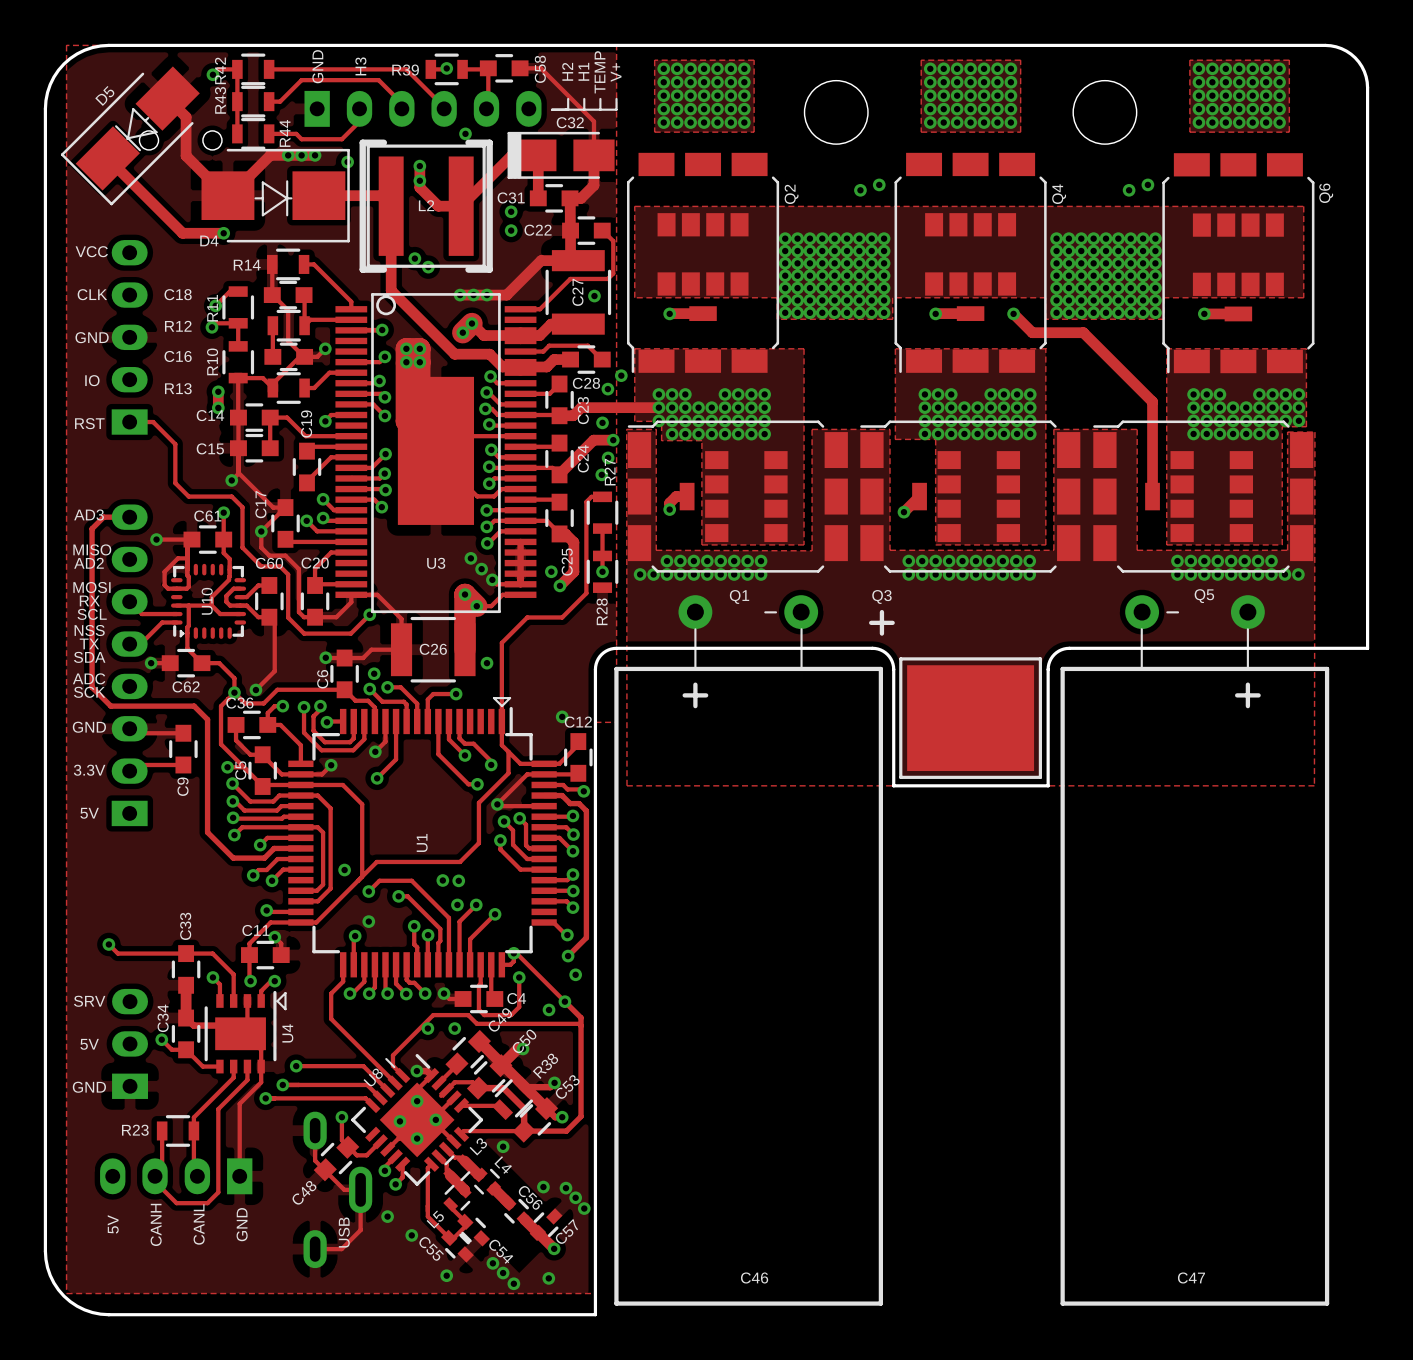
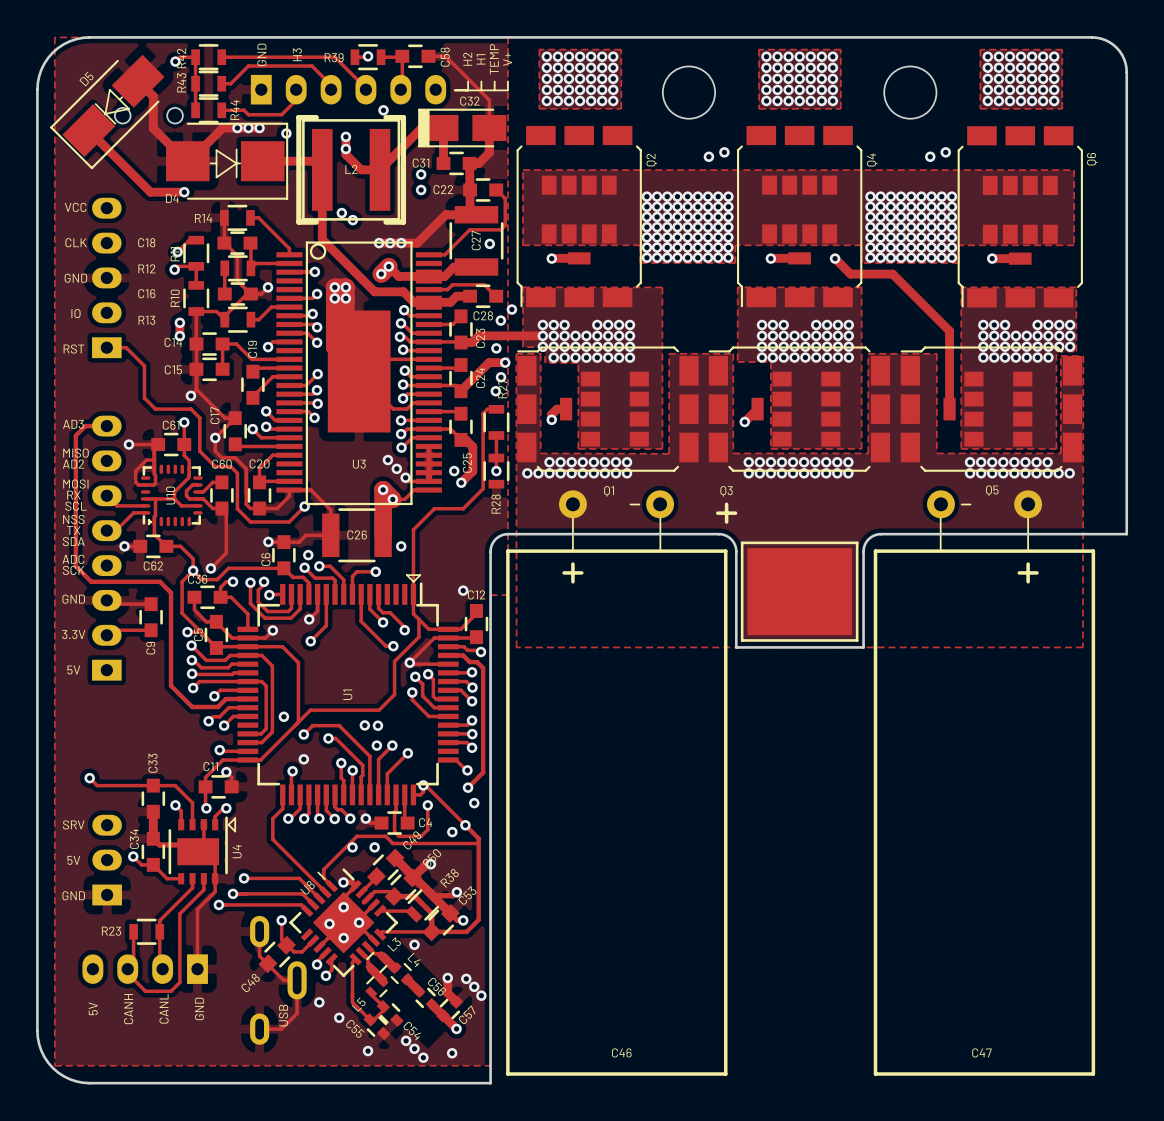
track: none -> (447, 977) (447, 993) (456, 1002)

